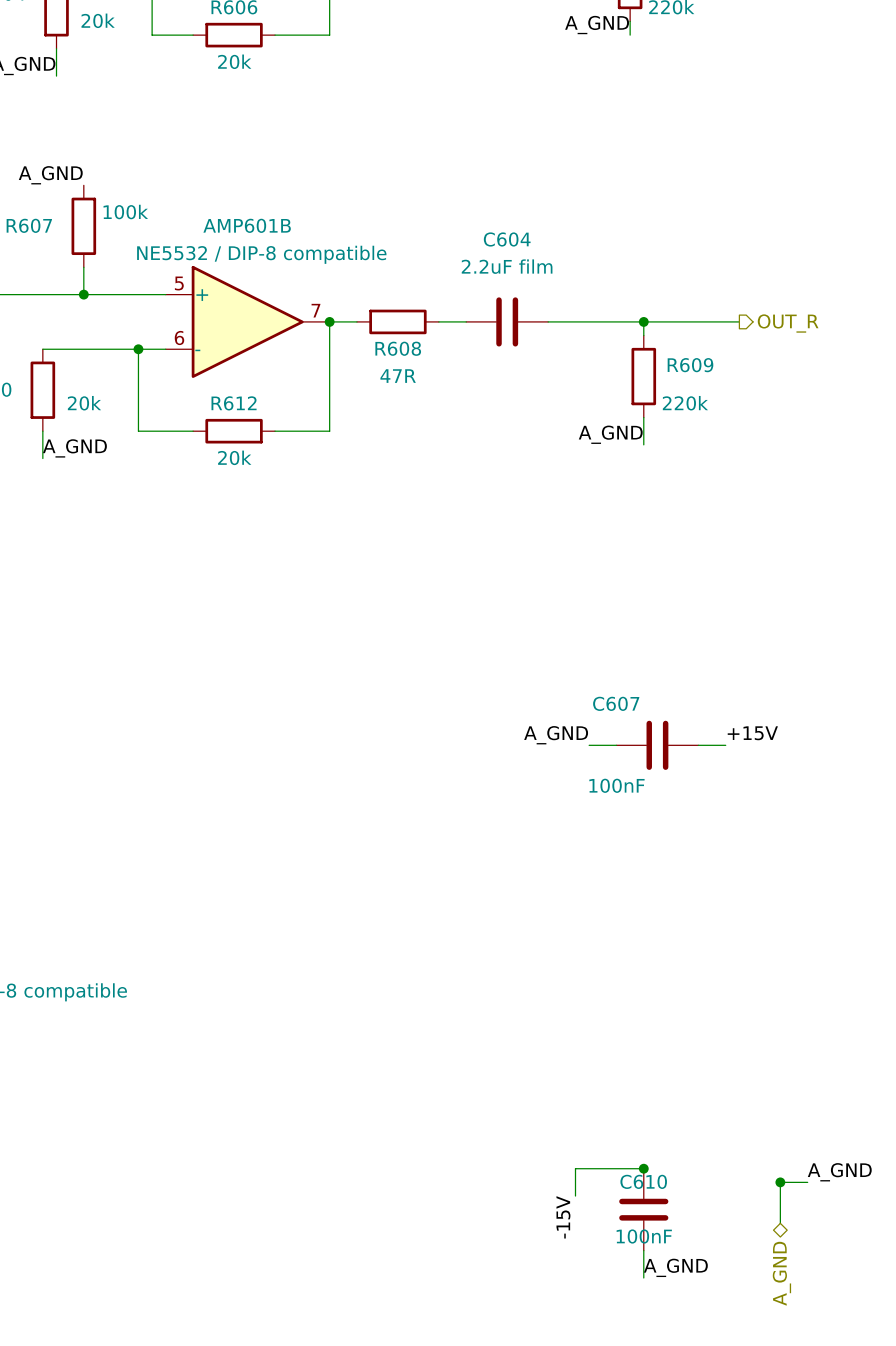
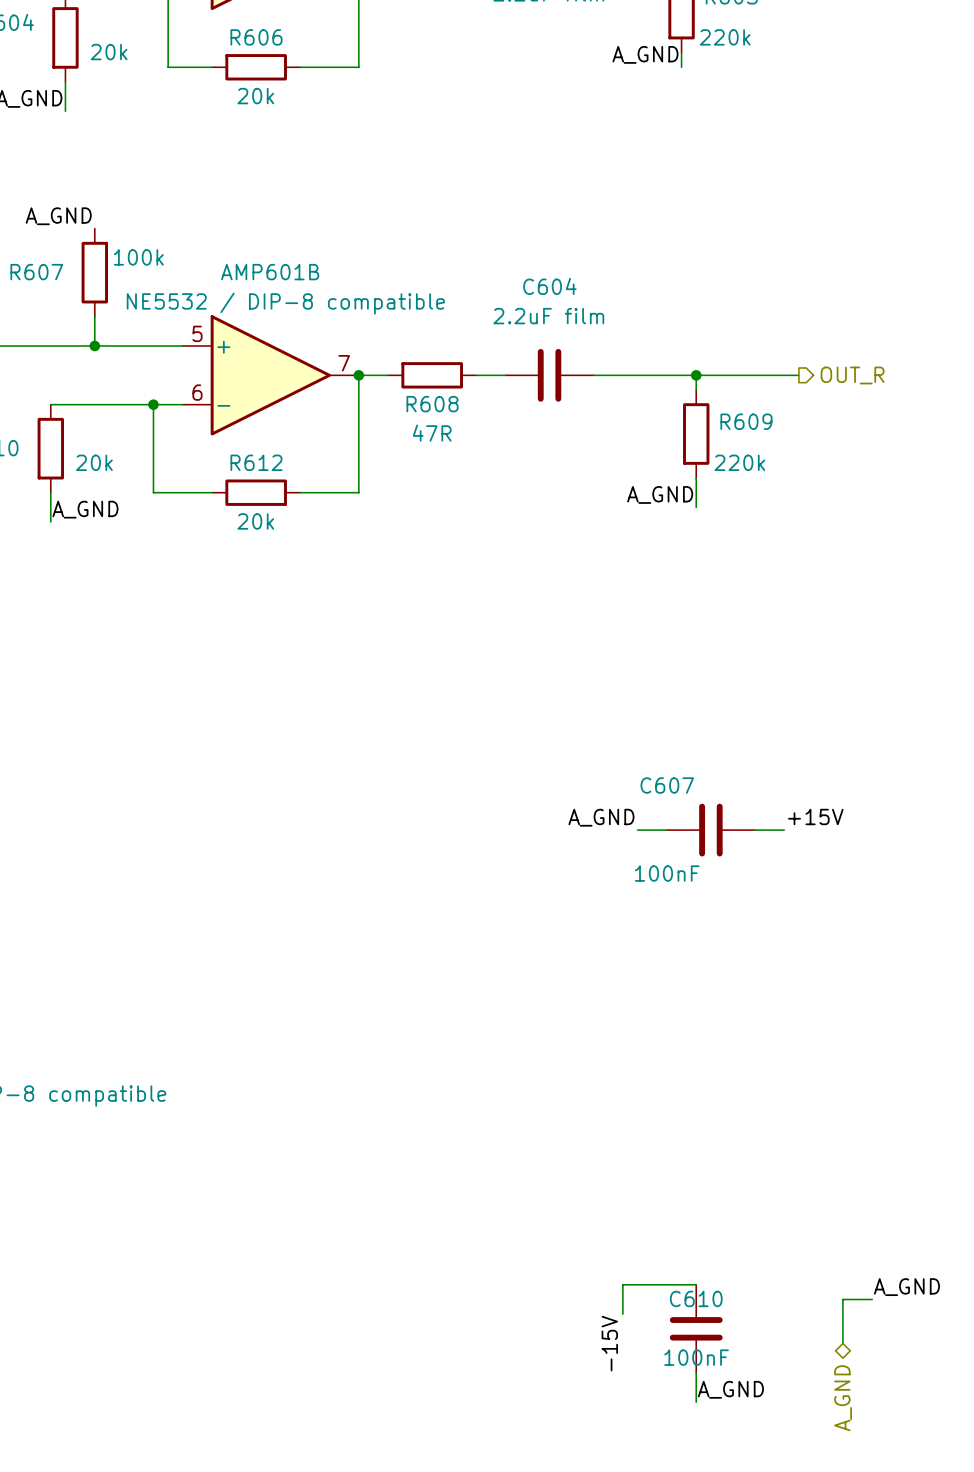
junction: (643, 1168) -> none
junction: (780, 1182) -> none

